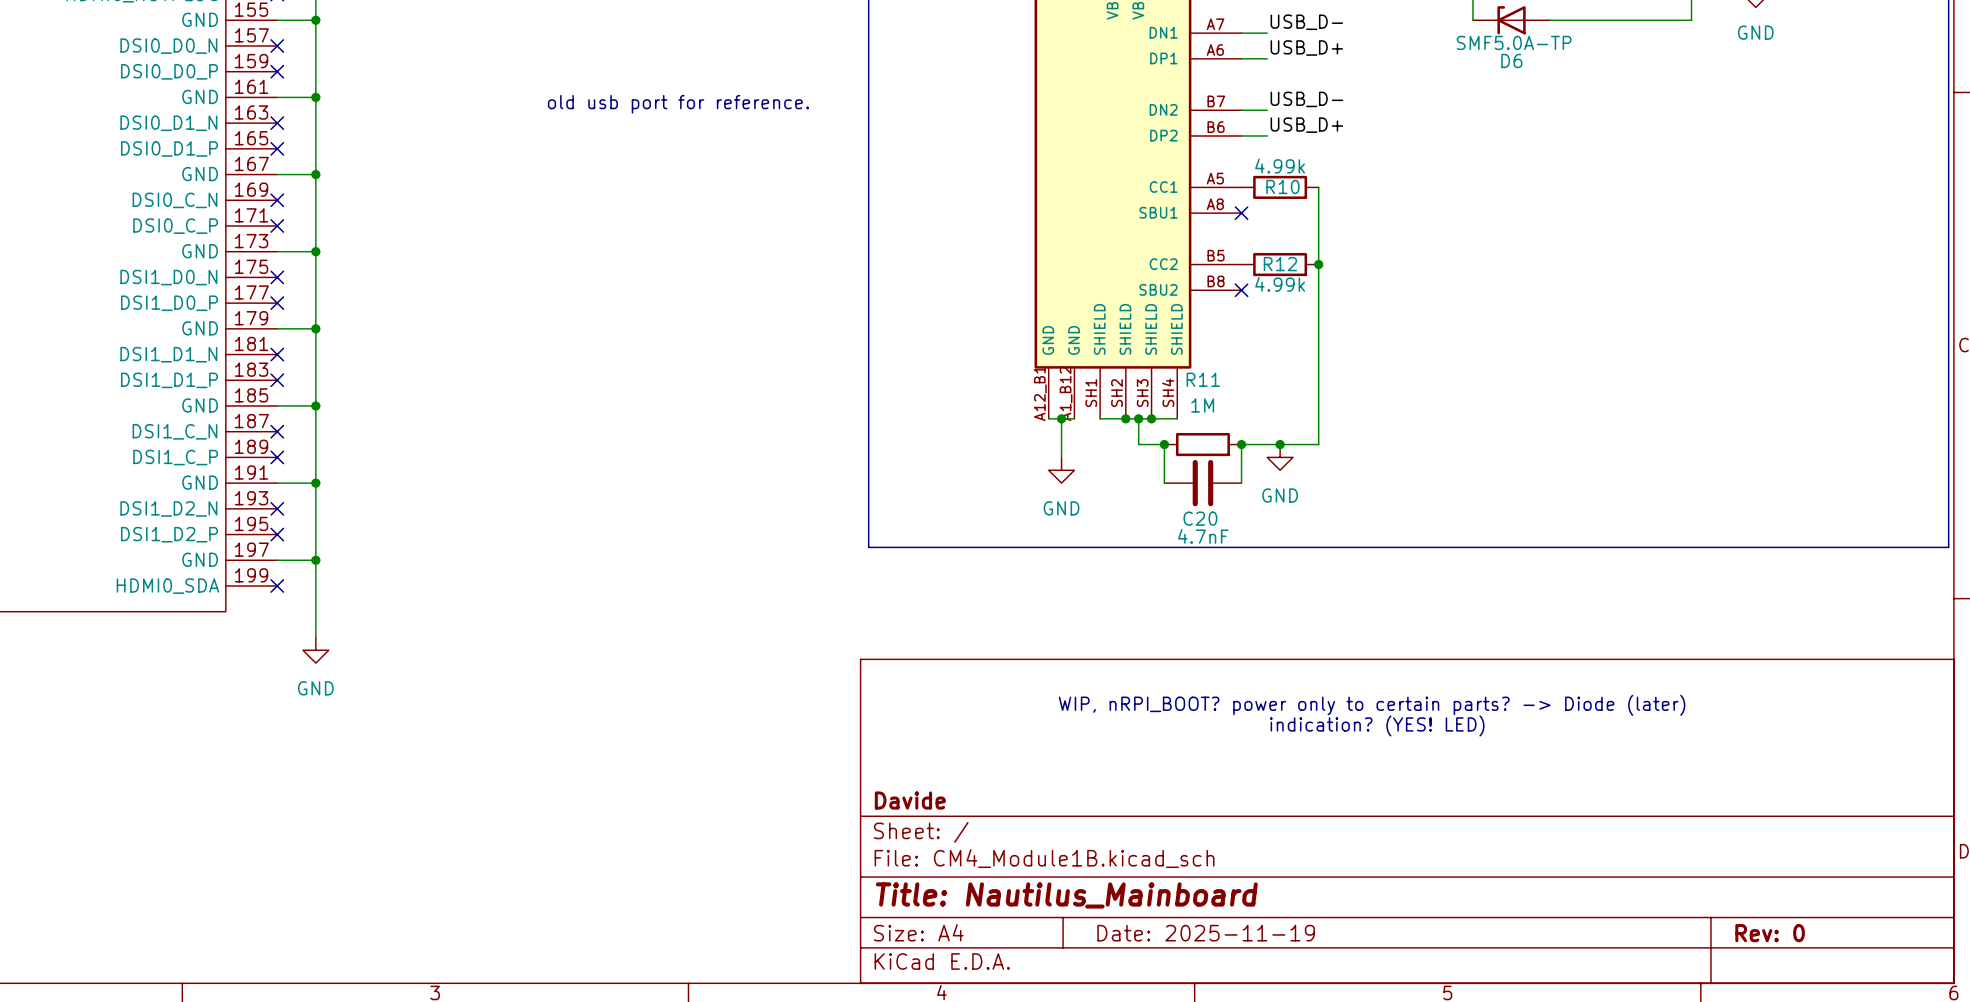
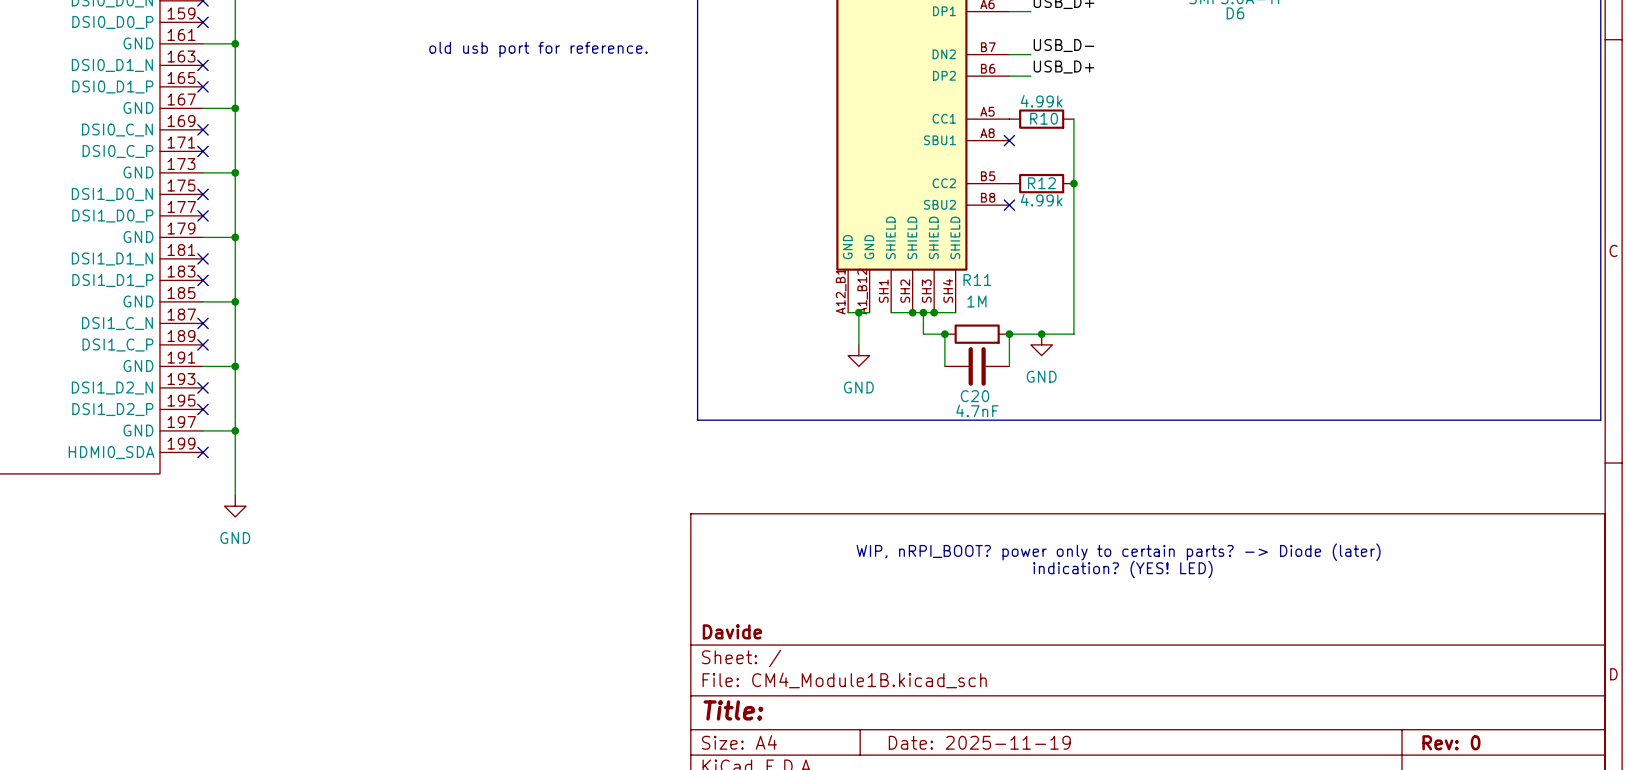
title block: Title: Nautilus_Mainboard (1066, 895) -> Title: (733, 710)

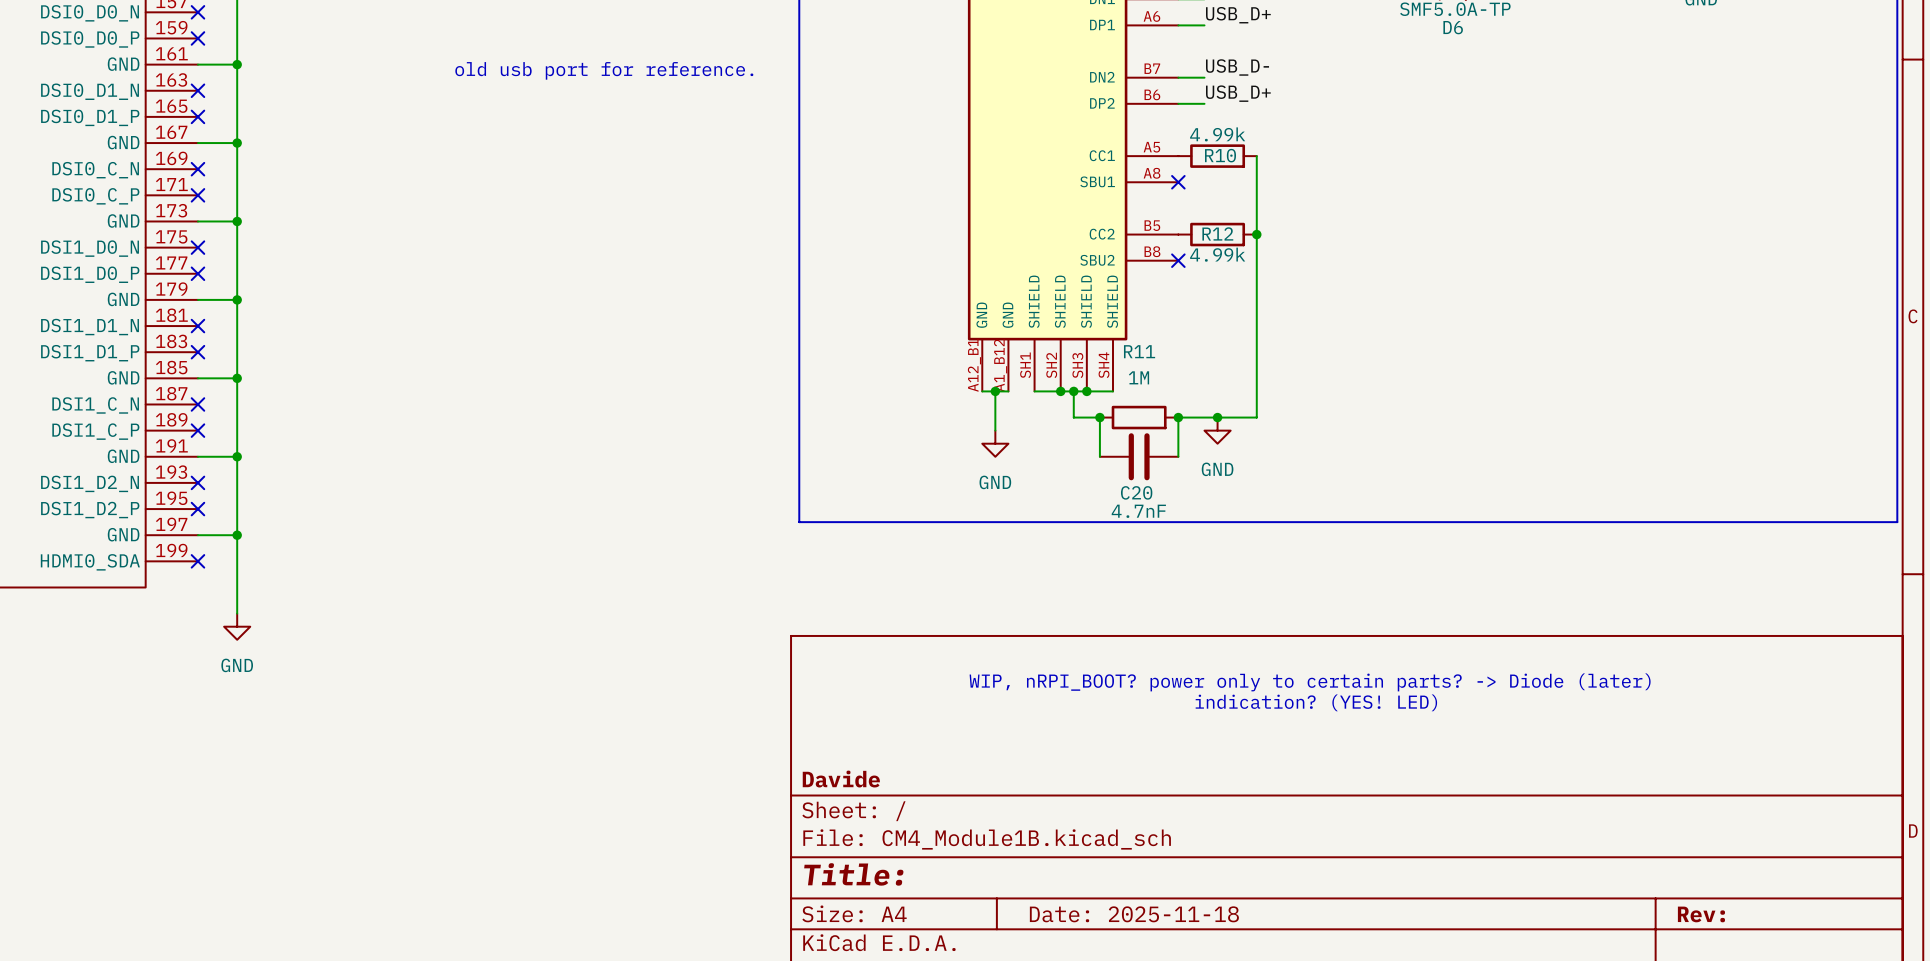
title block: Date: 2025-11-19 (979, 742) -> Date: 2025-11-18 (1134, 914)
title block: Rev: 0 (1451, 742) -> Rev: (1701, 914)

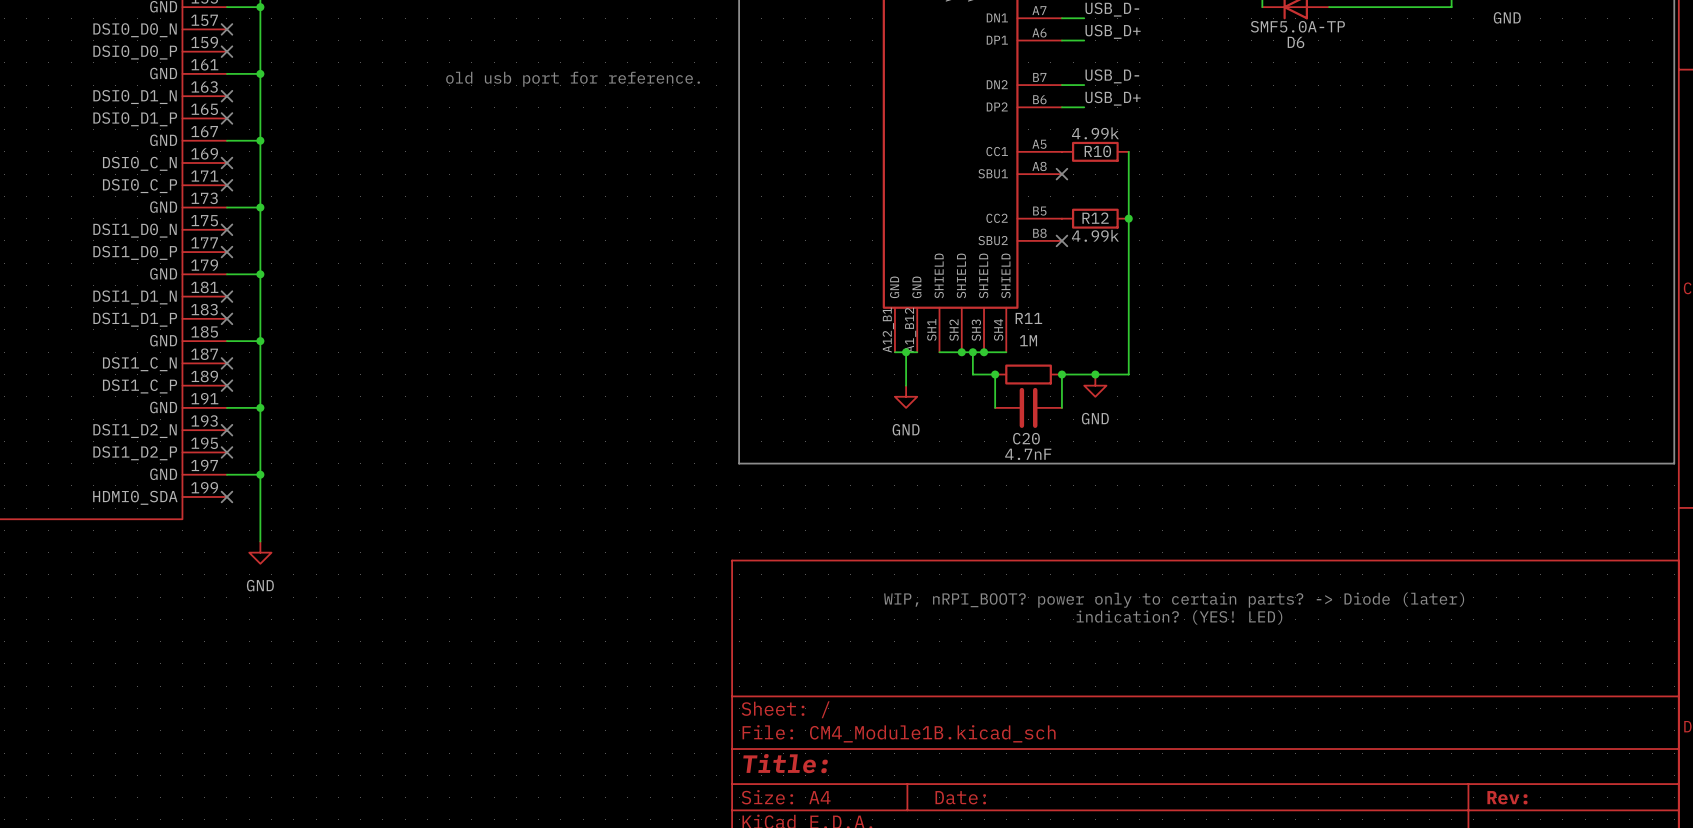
title block: Davide (841, 779) -> none
title block: Date: 2025-11-18 (1134, 914) -> Date: (960, 797)

